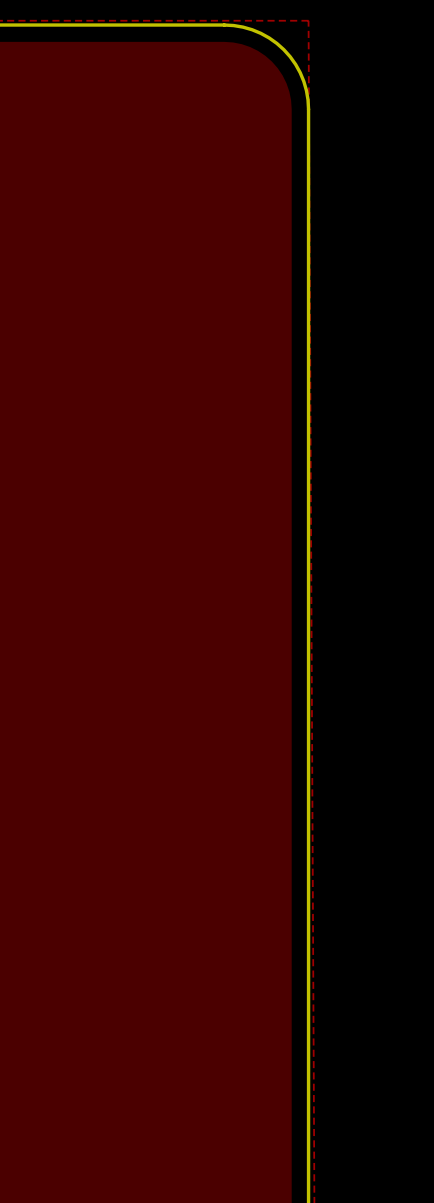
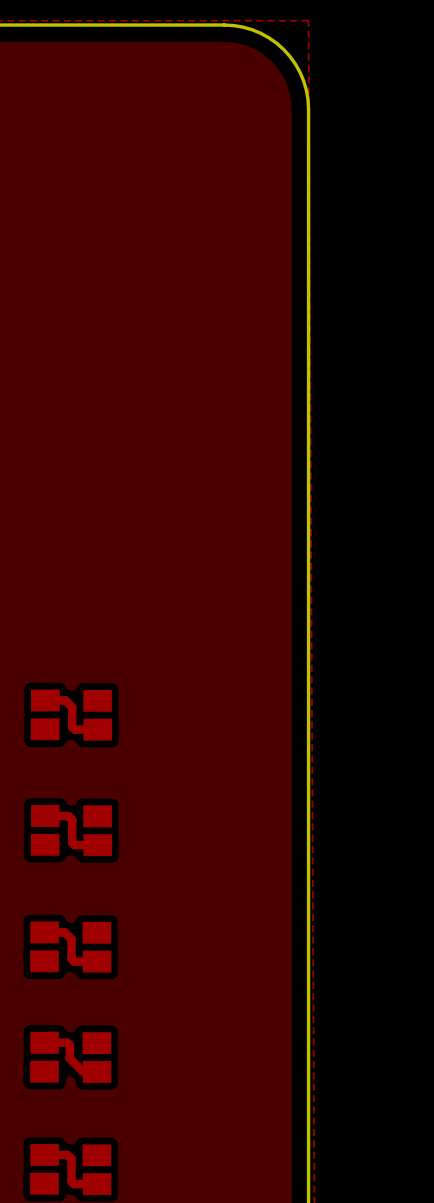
top track: none -> (45, 700) (65, 700) (72, 707) (72, 726) (74, 729) (97, 729)
part: none -> (71, 715)
top track: none -> (45, 816) (68, 816) (72, 819) (72, 842) (74, 845) (97, 845)
part: none -> (71, 830)
top track: none -> (44, 932) (64, 932) (71, 939) (71, 958) (74, 961) (97, 961)
part: none -> (70, 947)
top track: none -> (44, 1042) (67, 1042) (69, 1045) (69, 1058) (83, 1071) (97, 1071)
part: none -> (70, 1057)
top track: none -> (44, 1154) (67, 1154) (71, 1158) (71, 1181) (74, 1184) (97, 1184)
part: none -> (70, 1169)

